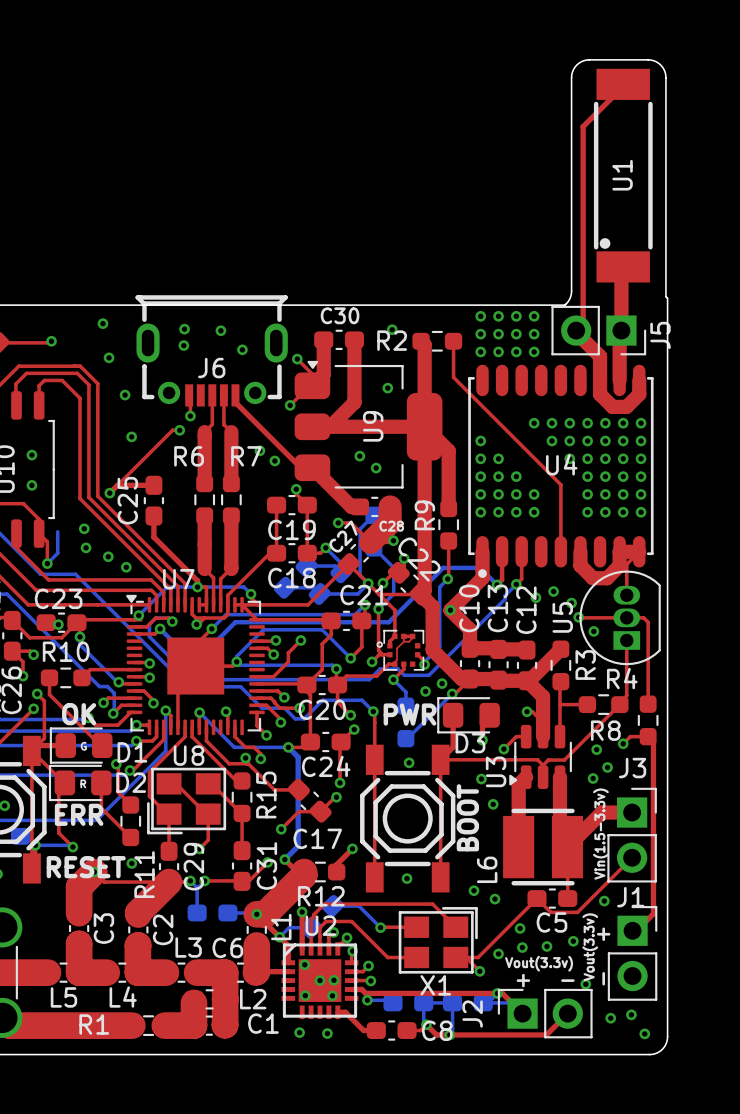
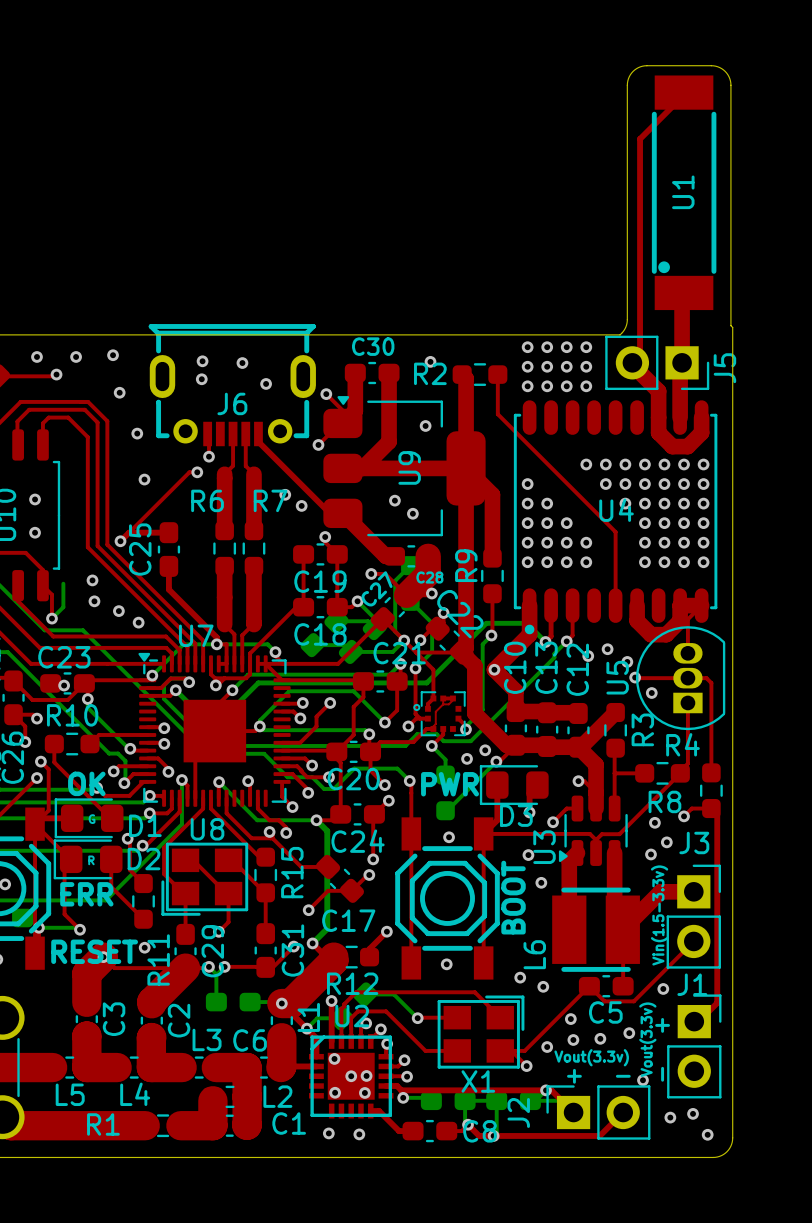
via: none -> (36, 356)
via: none -> (76, 356)

